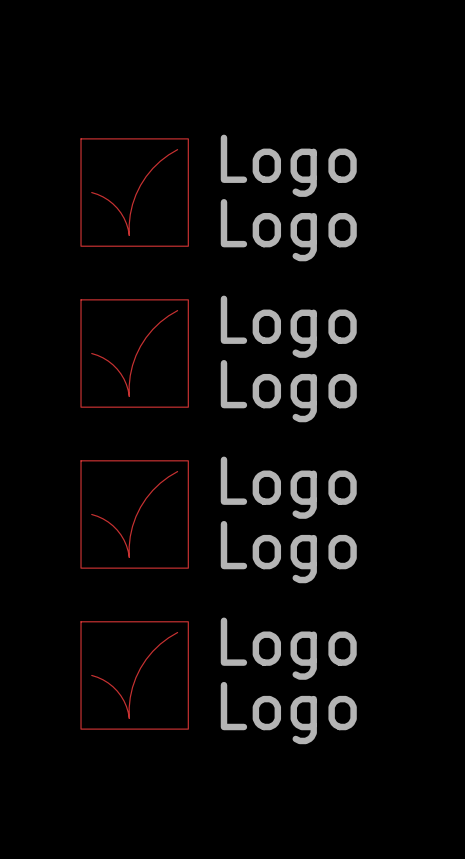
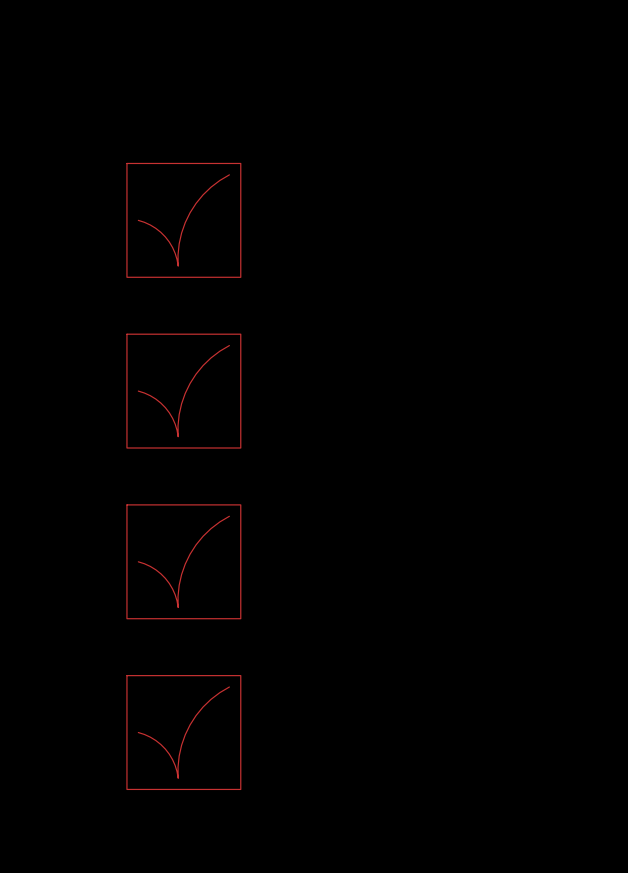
part value: Logo (288, 165) -> none
part text: Logo (288, 230) -> none
part value: Logo (288, 326) -> none
part text: Logo (288, 391) -> none
part value: Logo (288, 487) -> none
part text: Logo (288, 552) -> none
part value: Logo (288, 648) -> none
part text: Logo (288, 713) -> none

